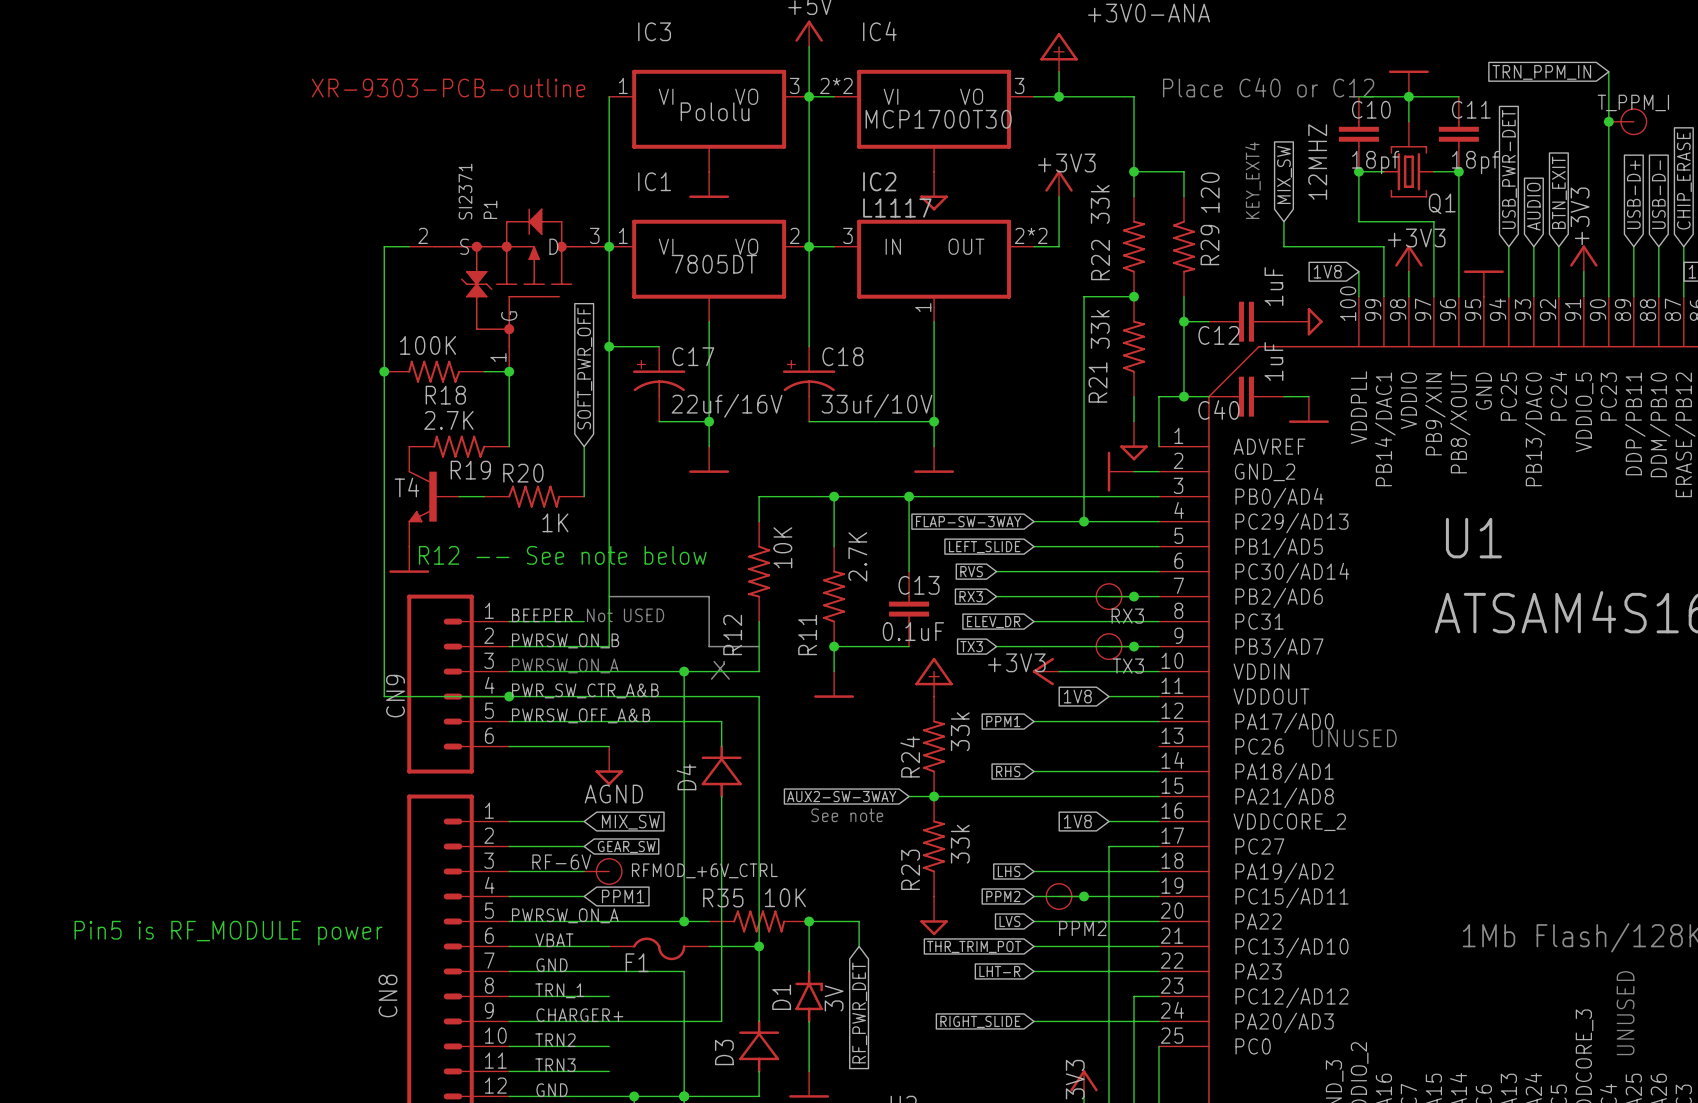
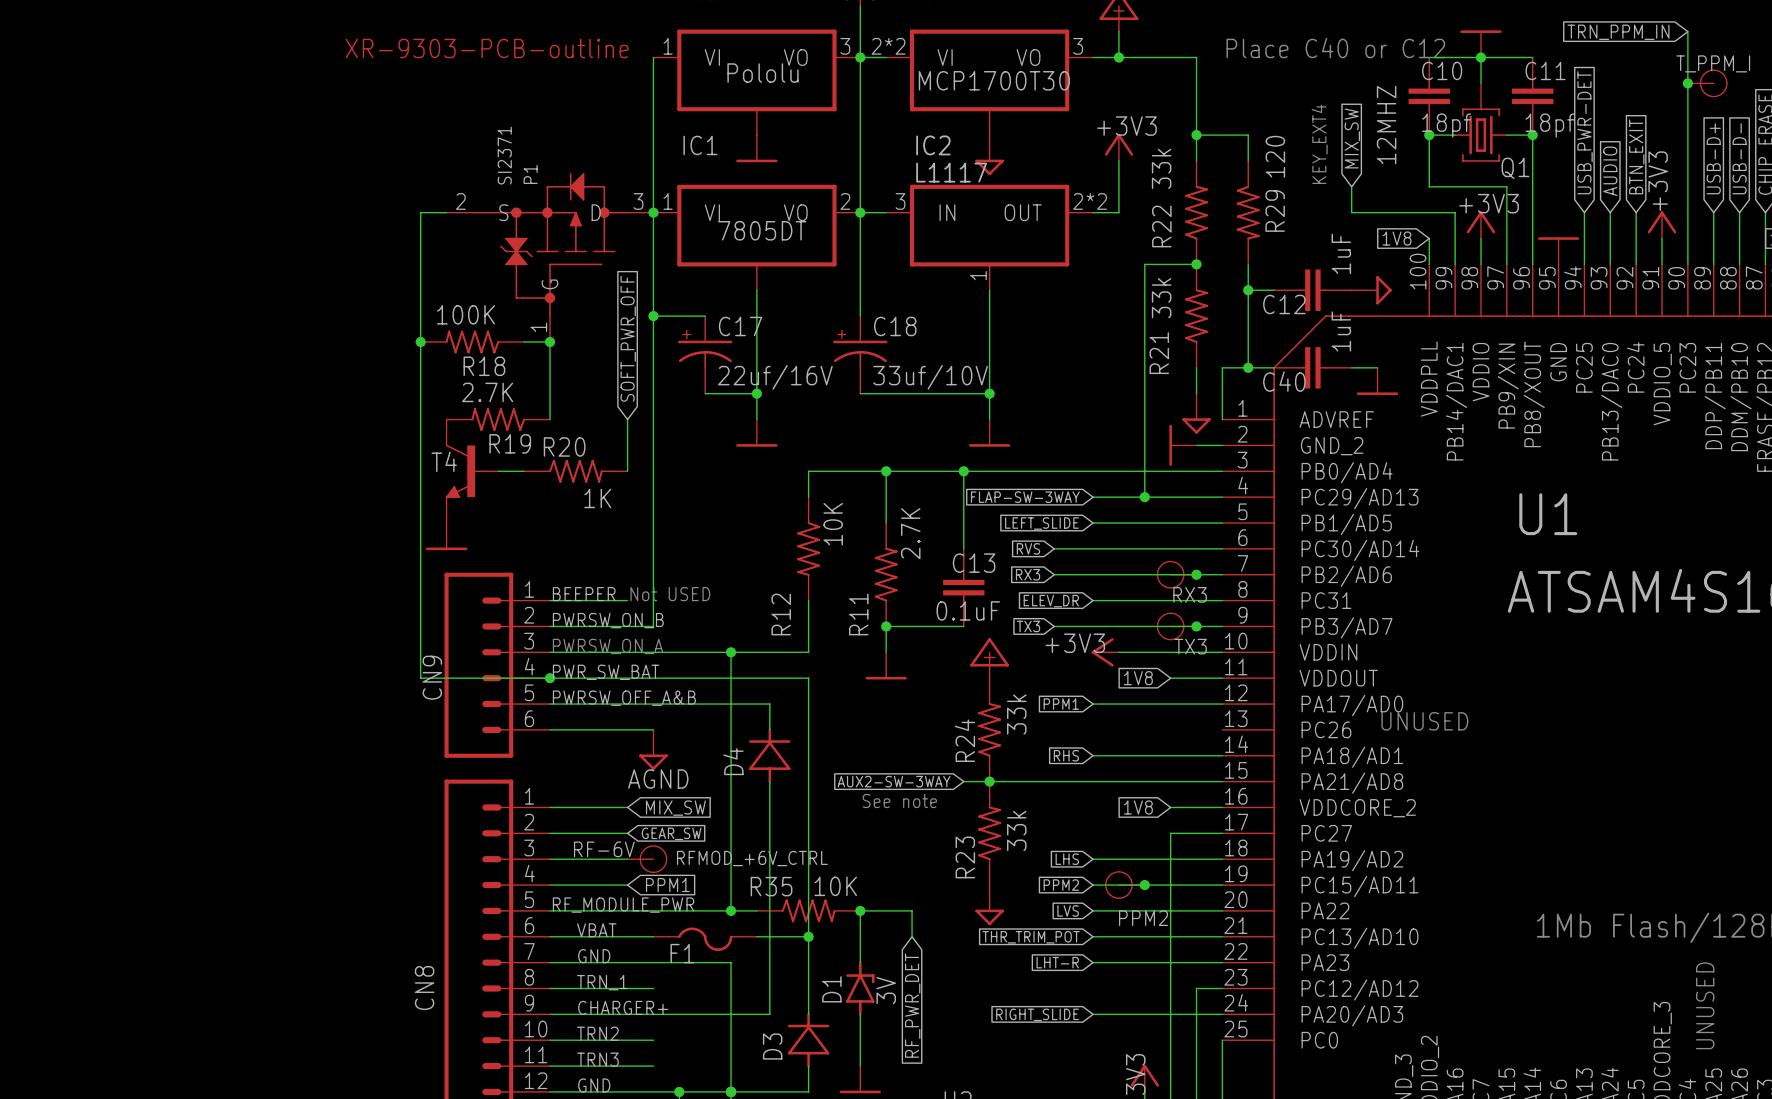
text: R12 -- See note below (562, 555) -> none
line: (609, 596) (709, 596) (709, 646) (759, 646) -> none
line: (714, 661) (729, 679) -> none
line: (724, 661) (711, 679) -> none
label: PWR_SW_CTR_A&B (585, 690) -> PWR_SW_BAT (606, 672)
label: PWRSW_ON_A (565, 915) -> RF_MODULE_PWR (623, 905)
text: Pin5 is RF_MODULE power (228, 933) -> none

